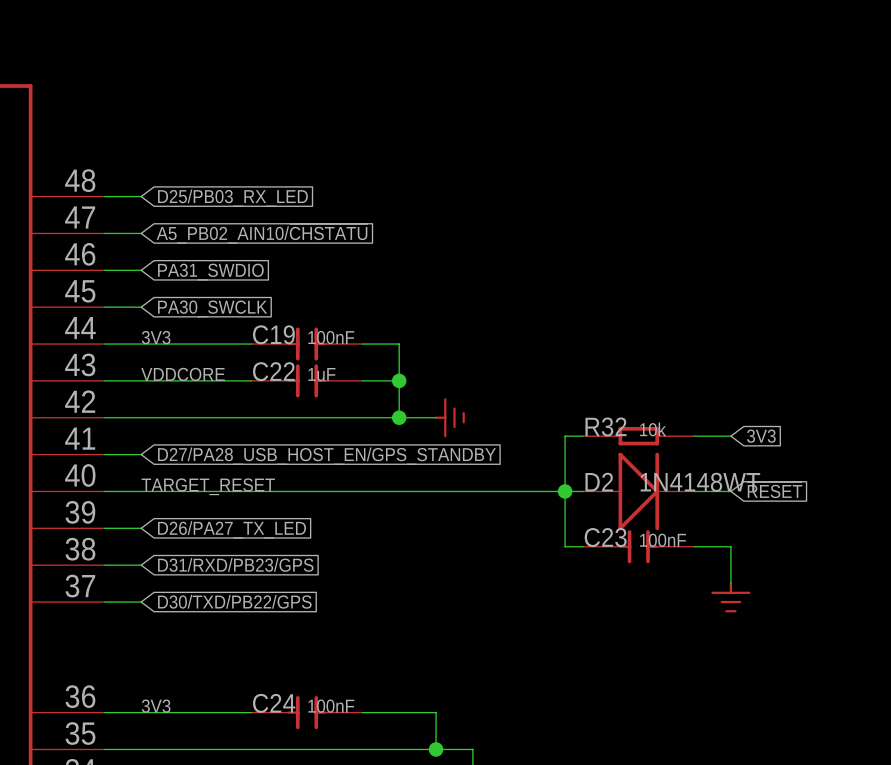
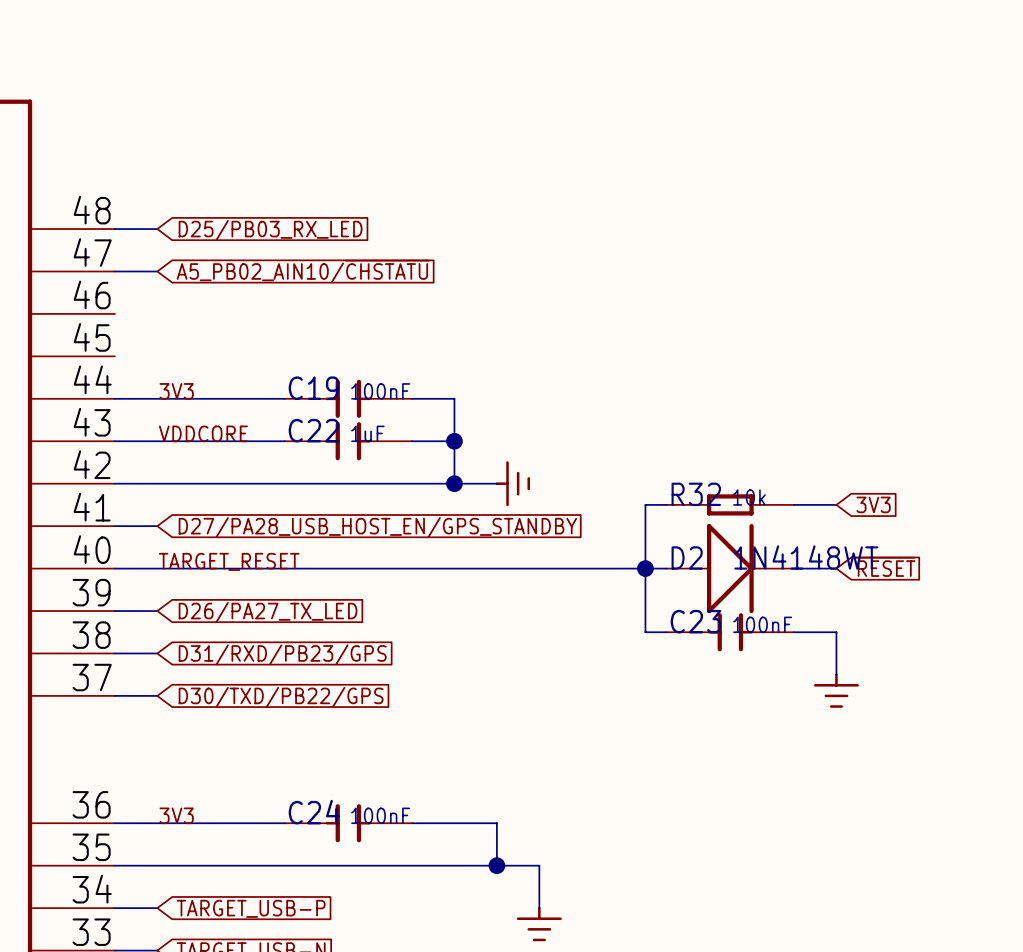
wire: (104, 270) (141, 270) -> none
global label: PA31_SWDIO (210, 272) -> none
wire: (104, 307) (141, 307) -> none
global label: PA30_SWCLK (212, 308) -> none

